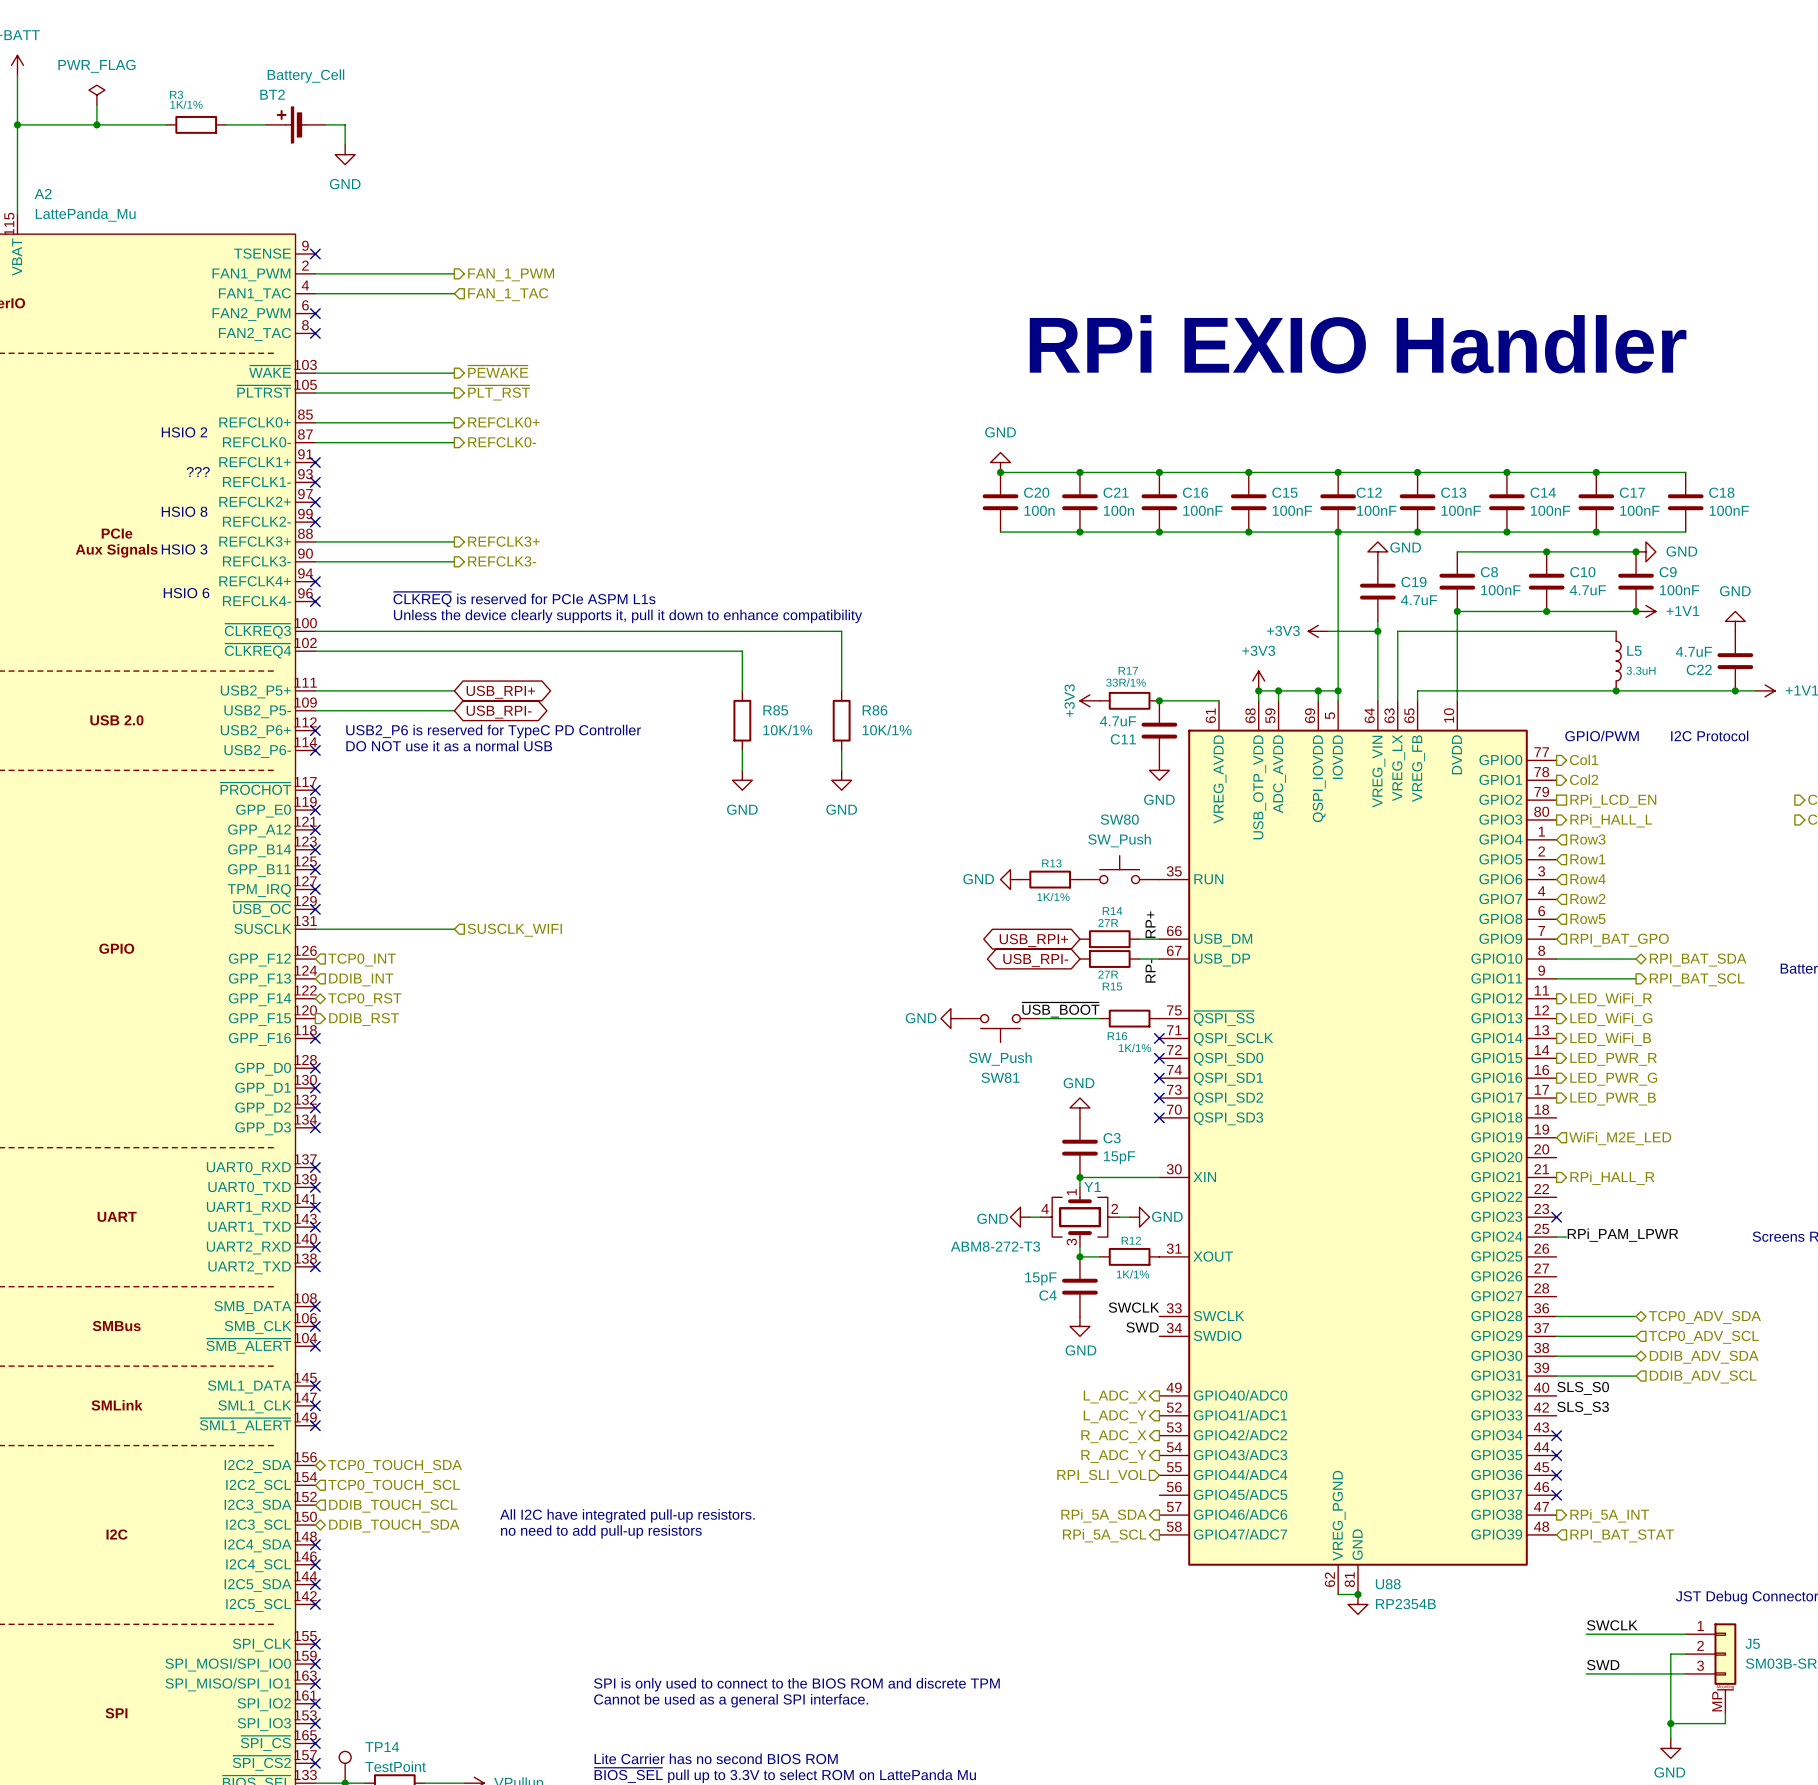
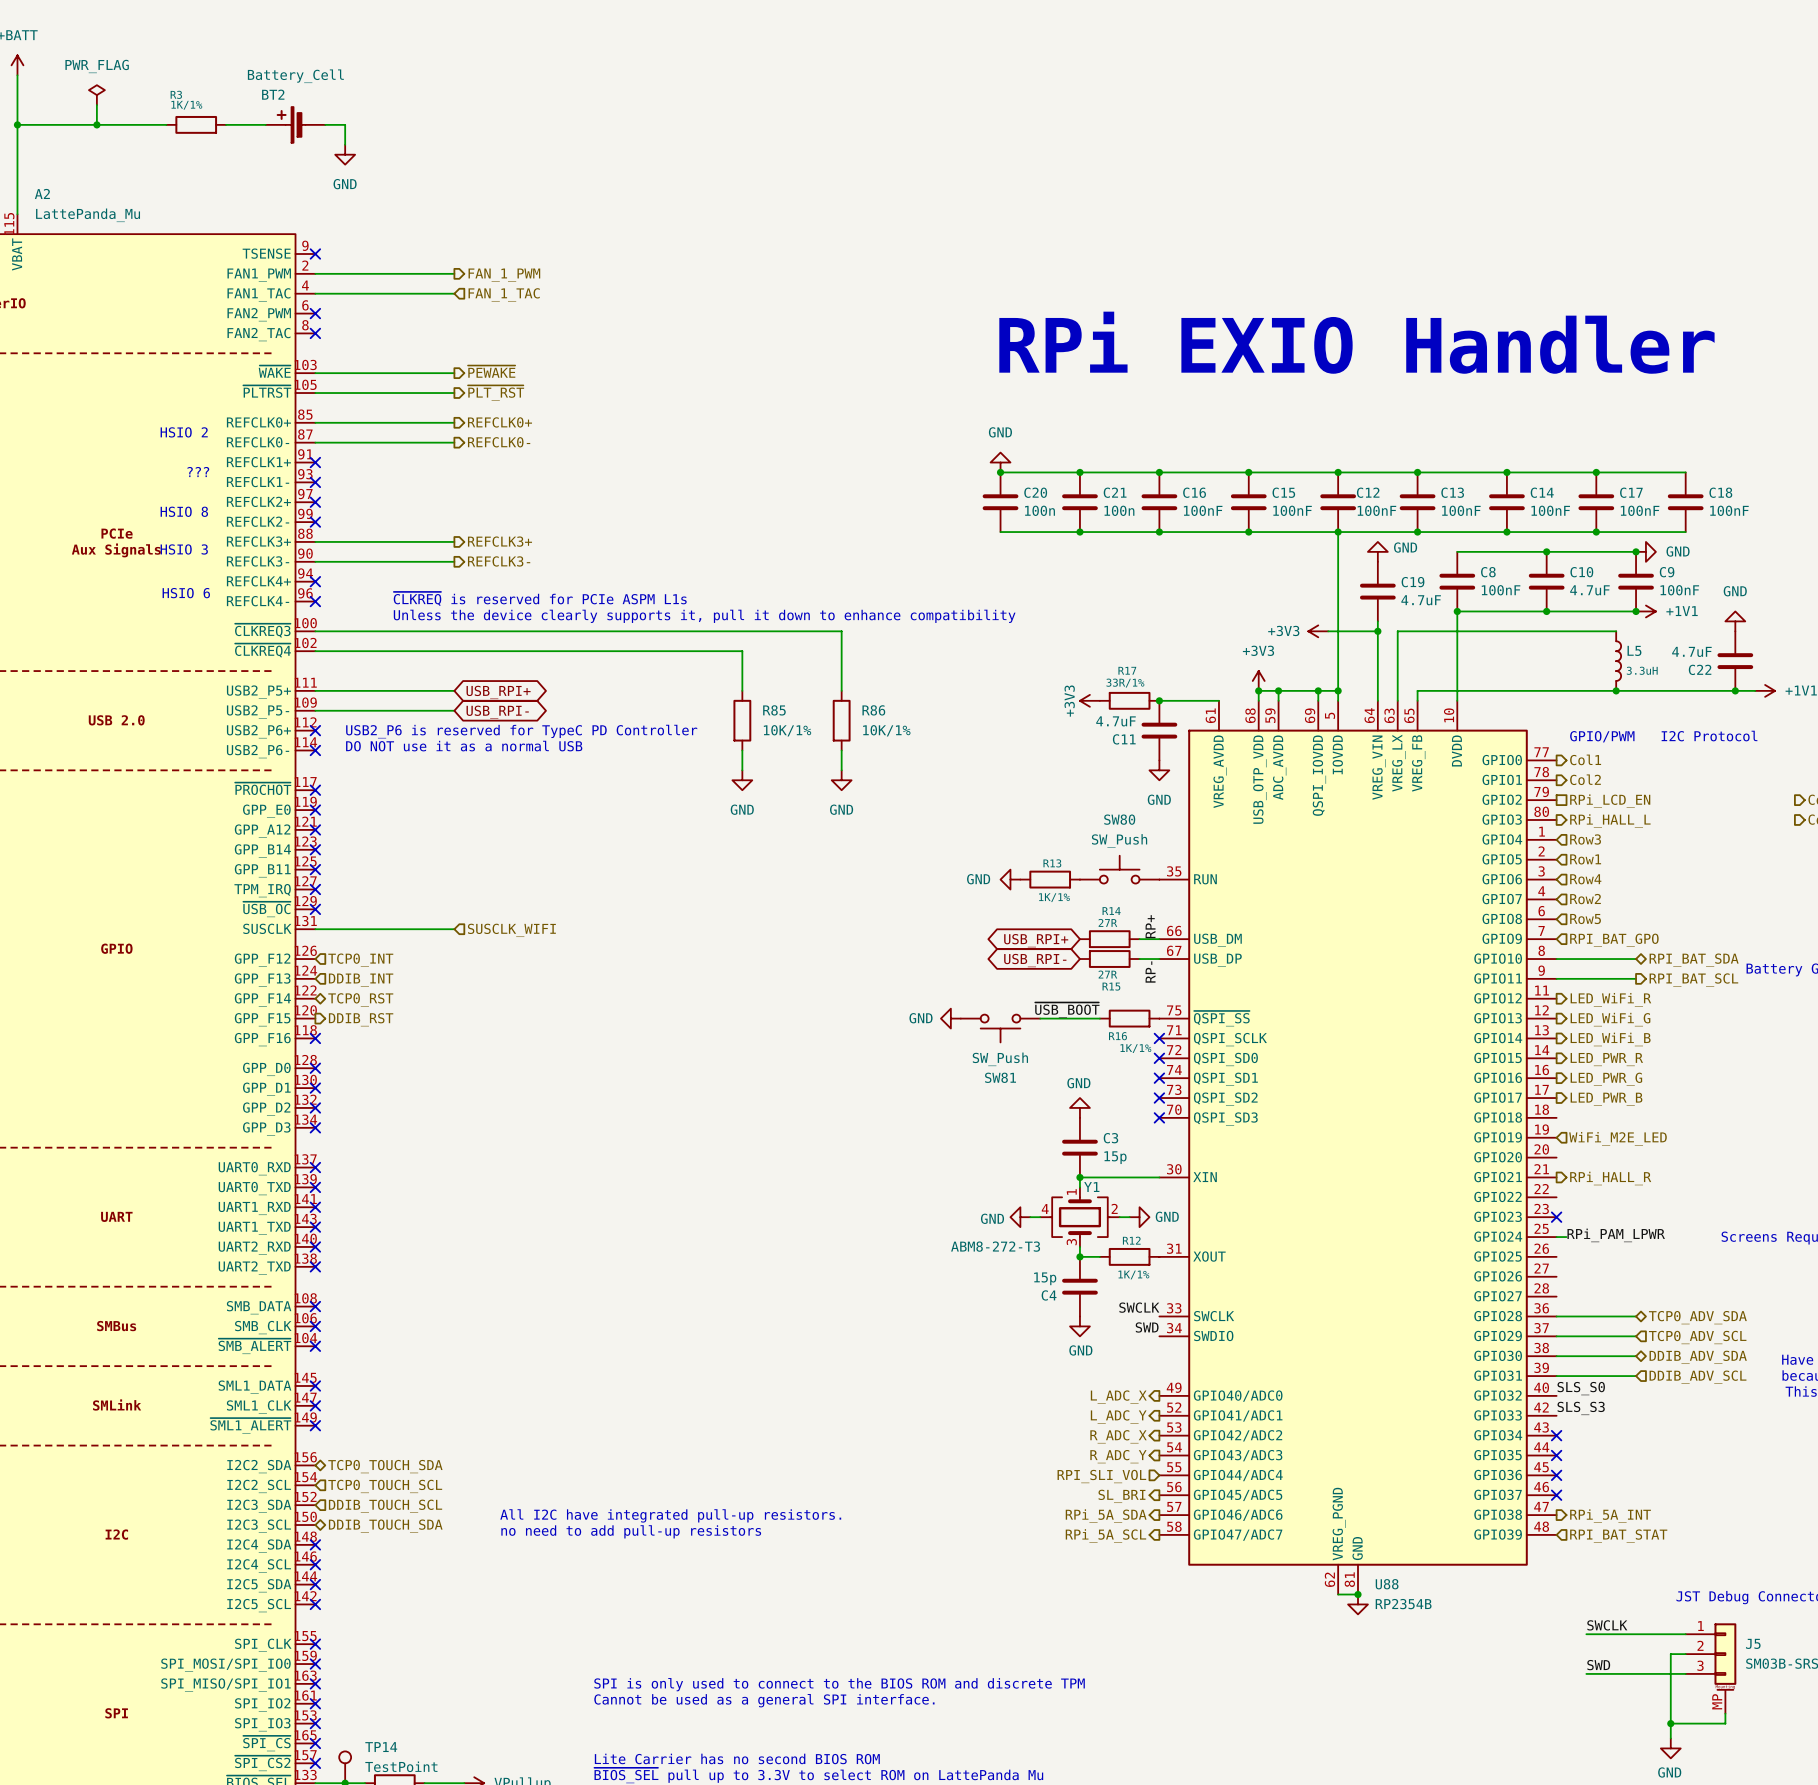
C3 value: 15pF (1119, 1157) -> 15p (1115, 1157)
C4 value: 15pF (1040, 1278) -> 15p (1045, 1278)
hierarchical label: none -> SL_BRI (1121, 1496)

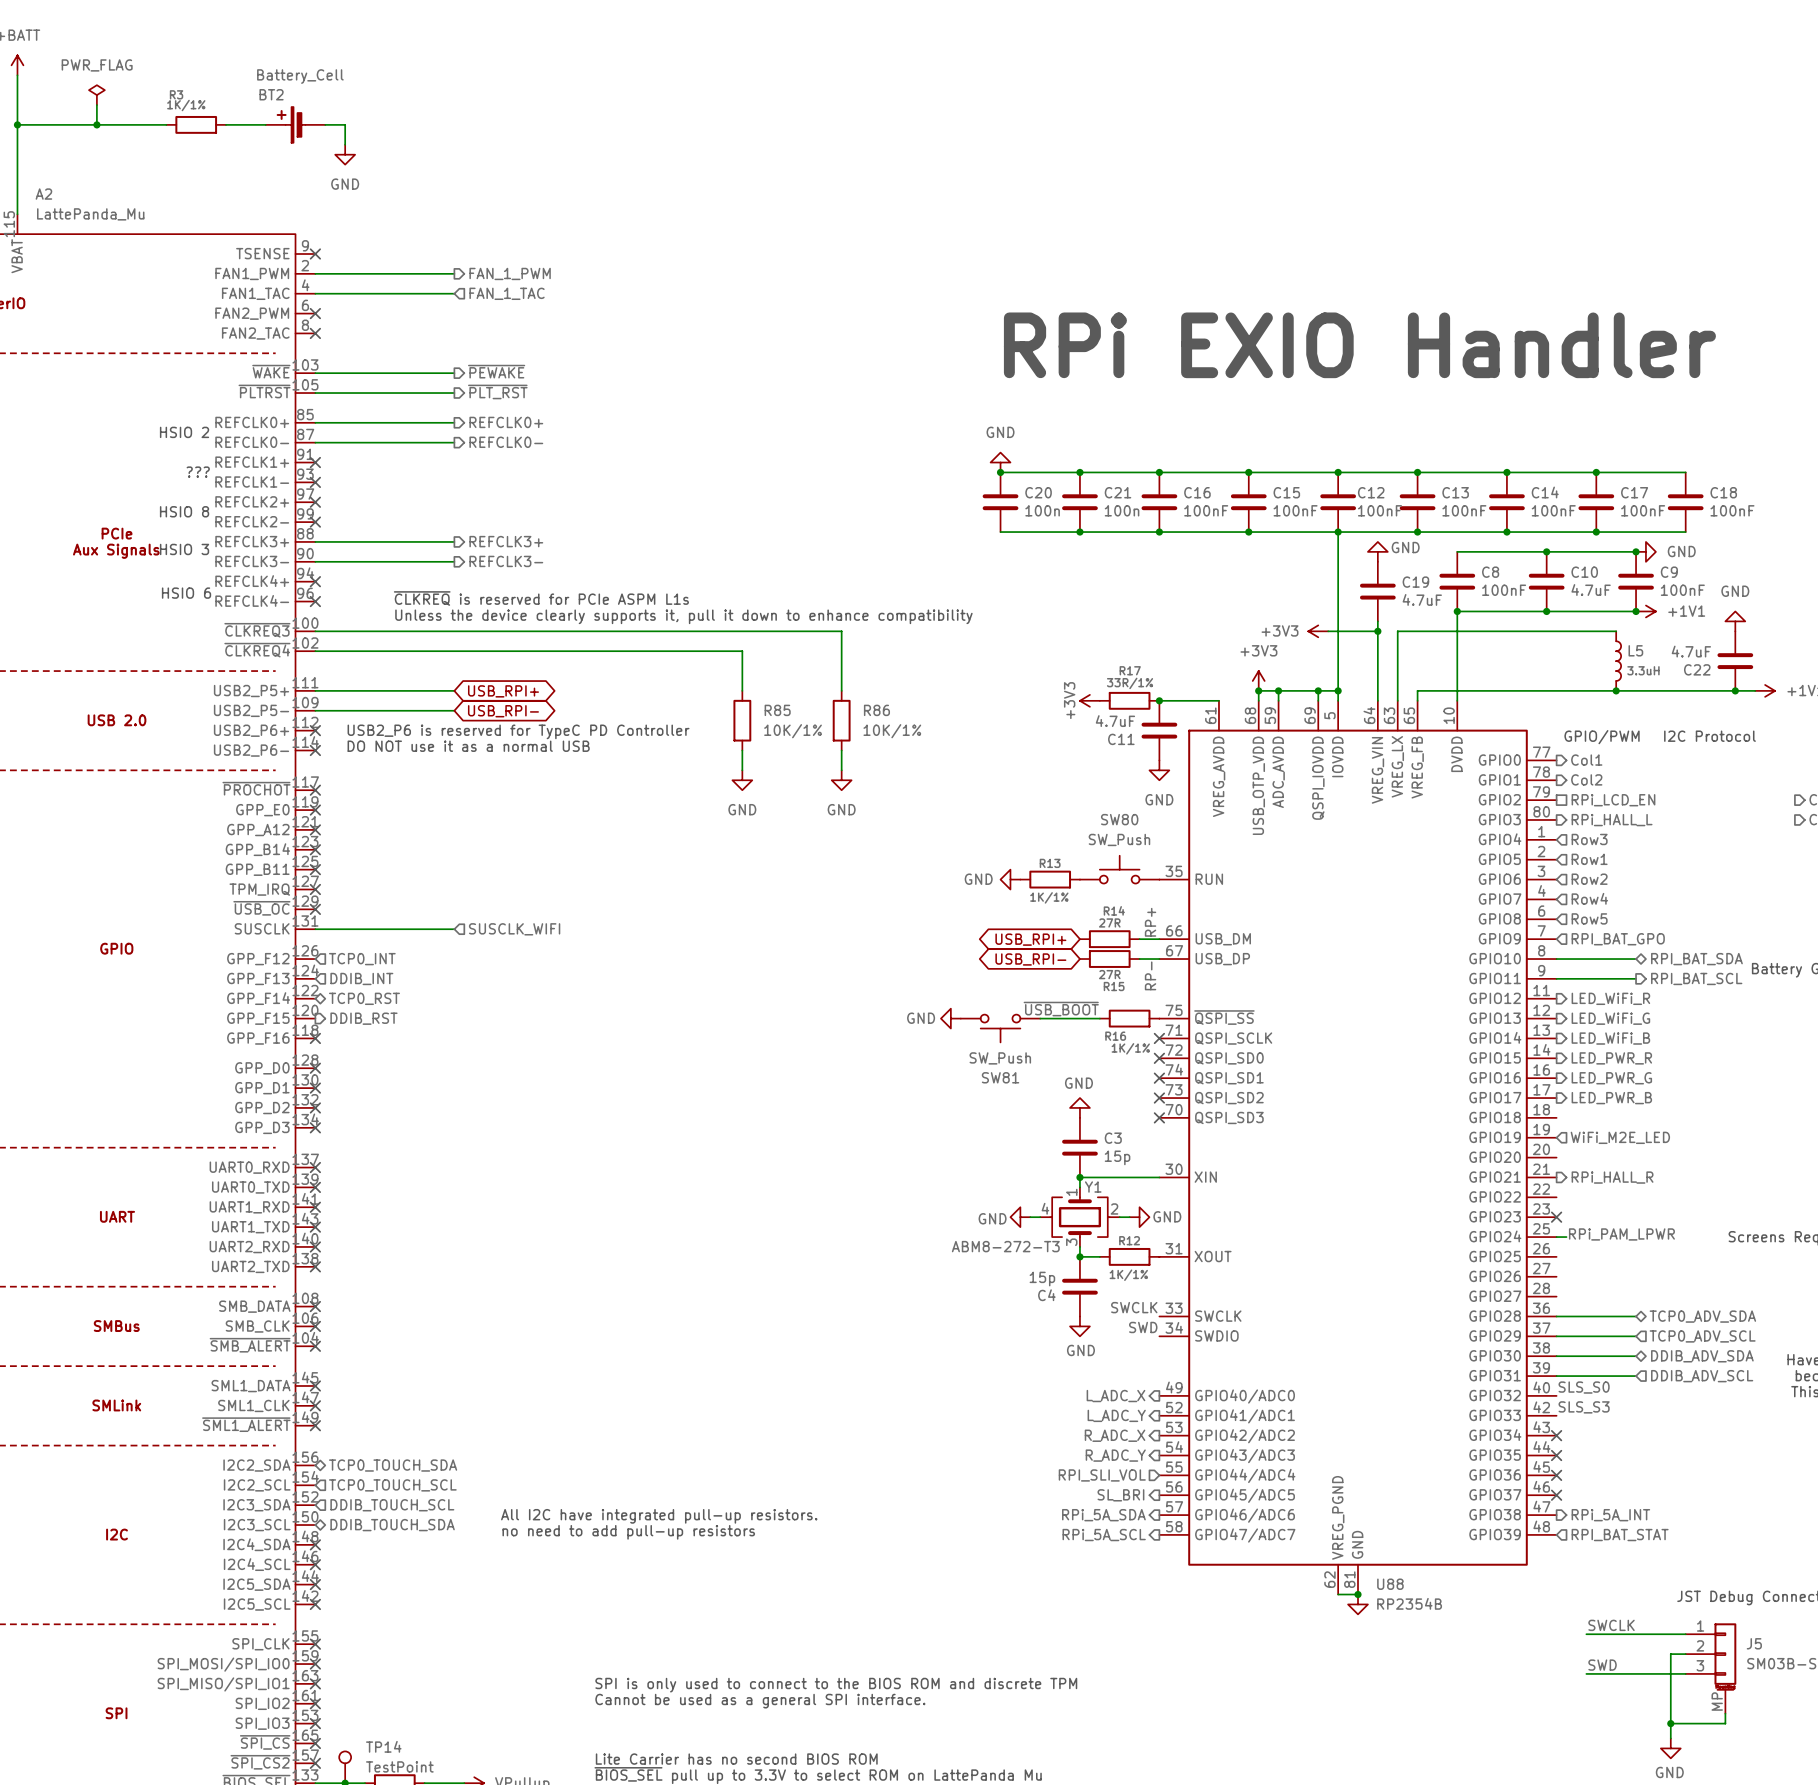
hierarchical label: Row4 (1585, 879) -> Row2 (1589, 879)
hierarchical label: Row2 (1585, 899) -> Row4 (1589, 898)

